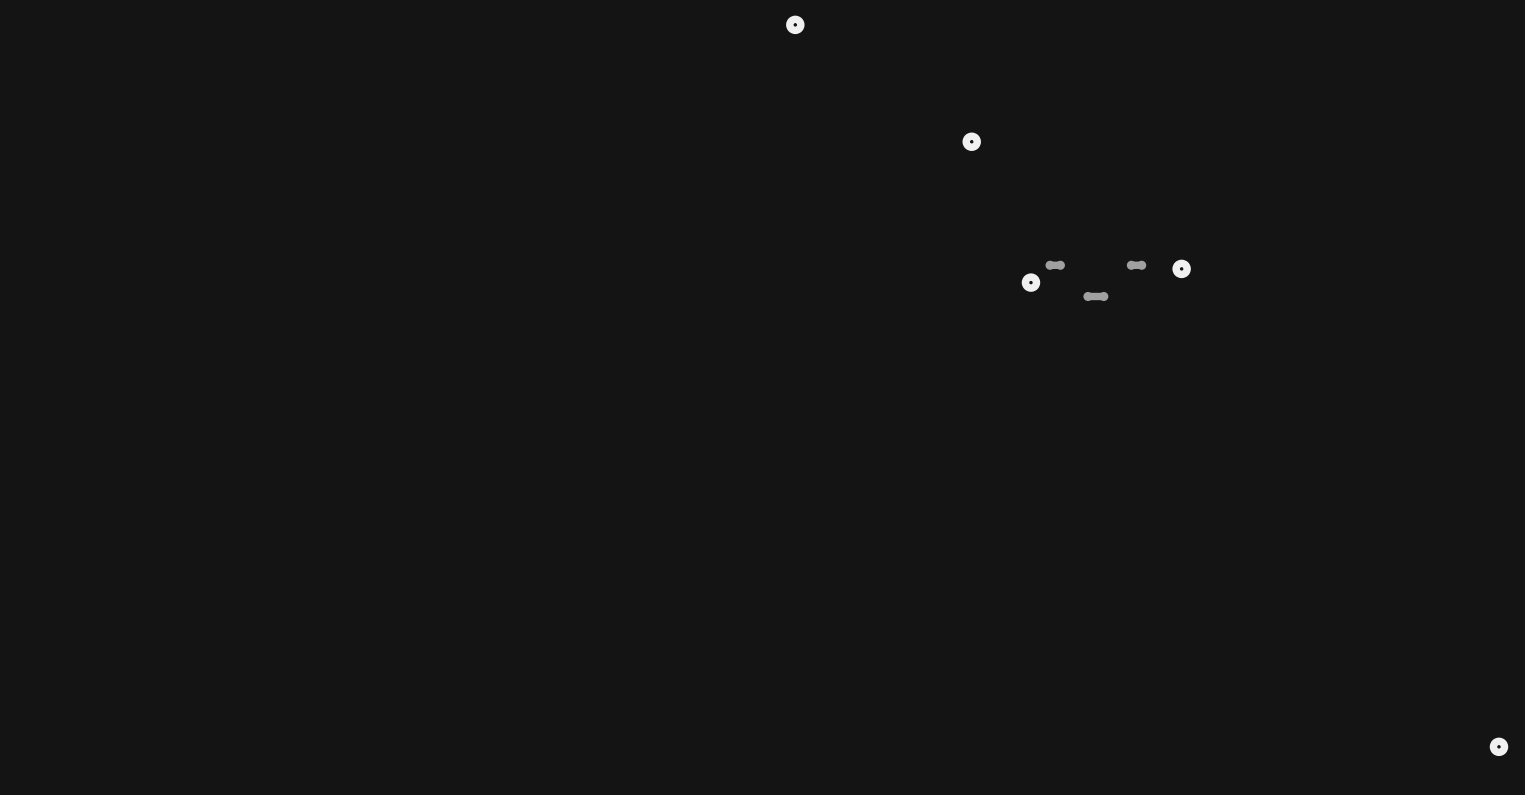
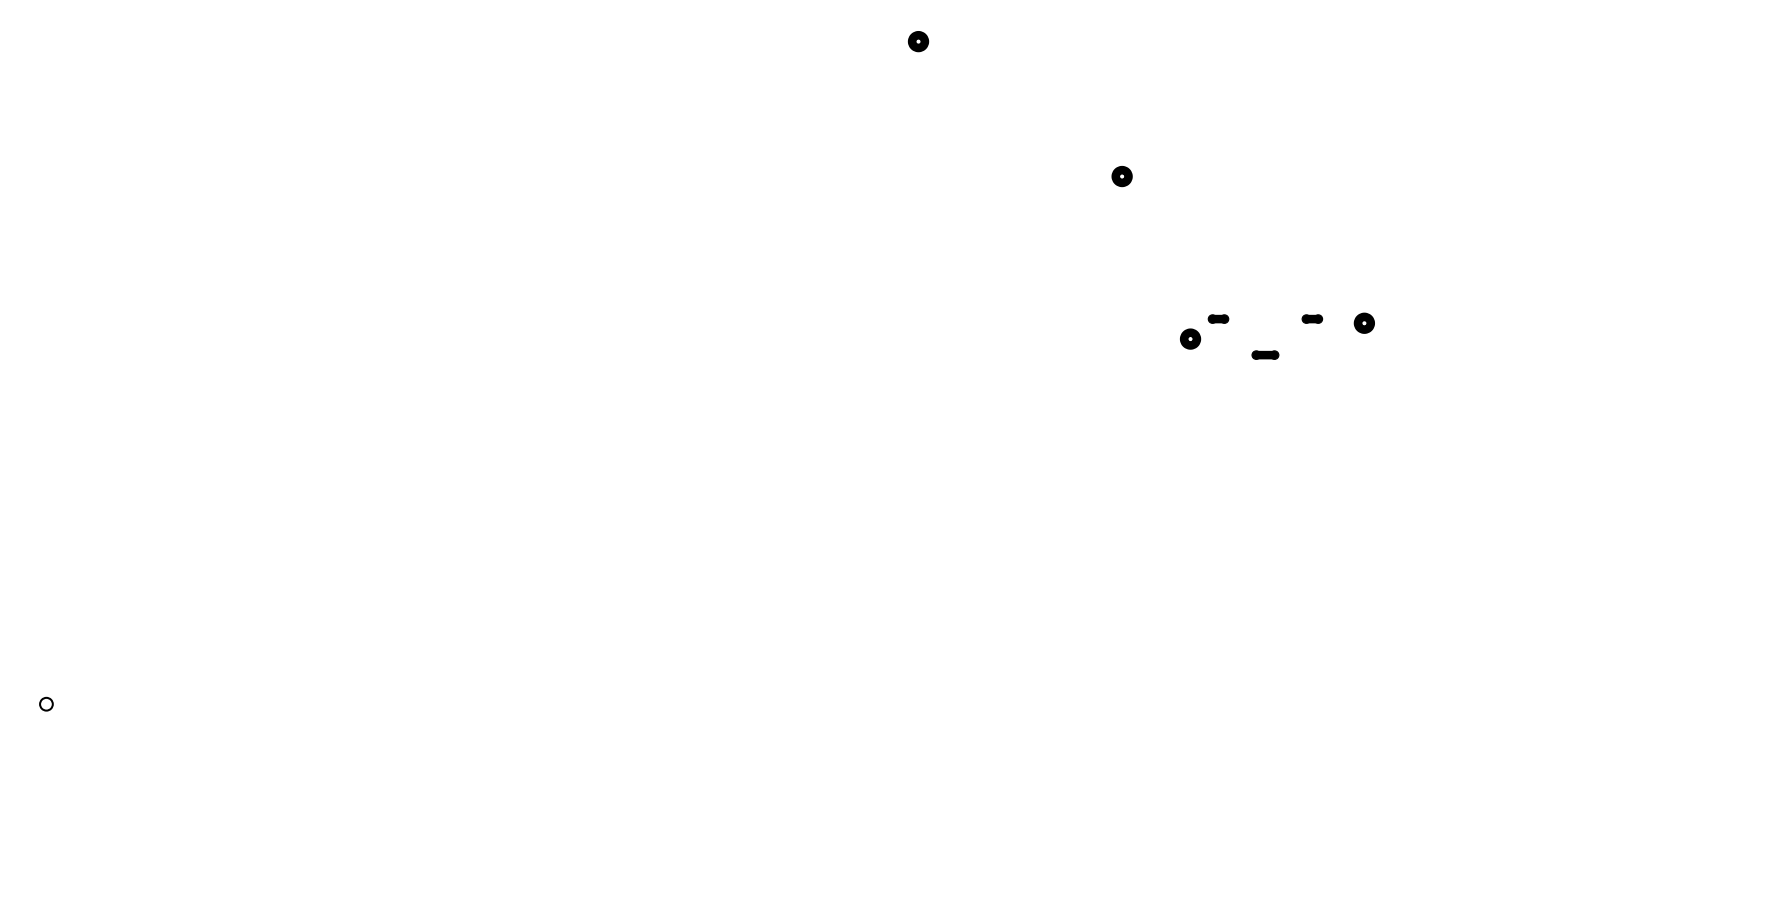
part: none -> (46, 704)
part: (1498, 746) -> none

